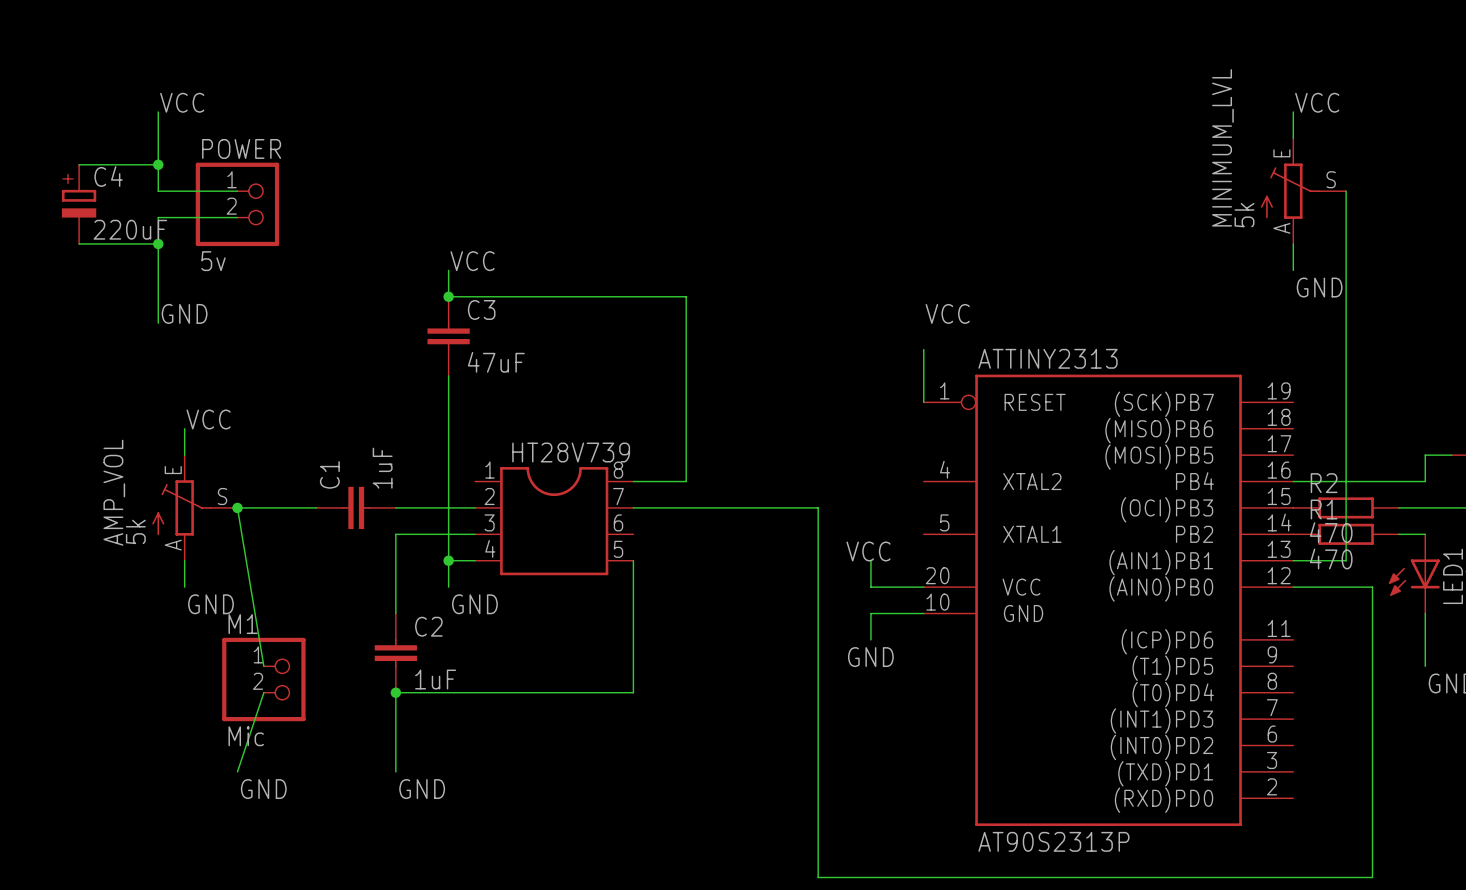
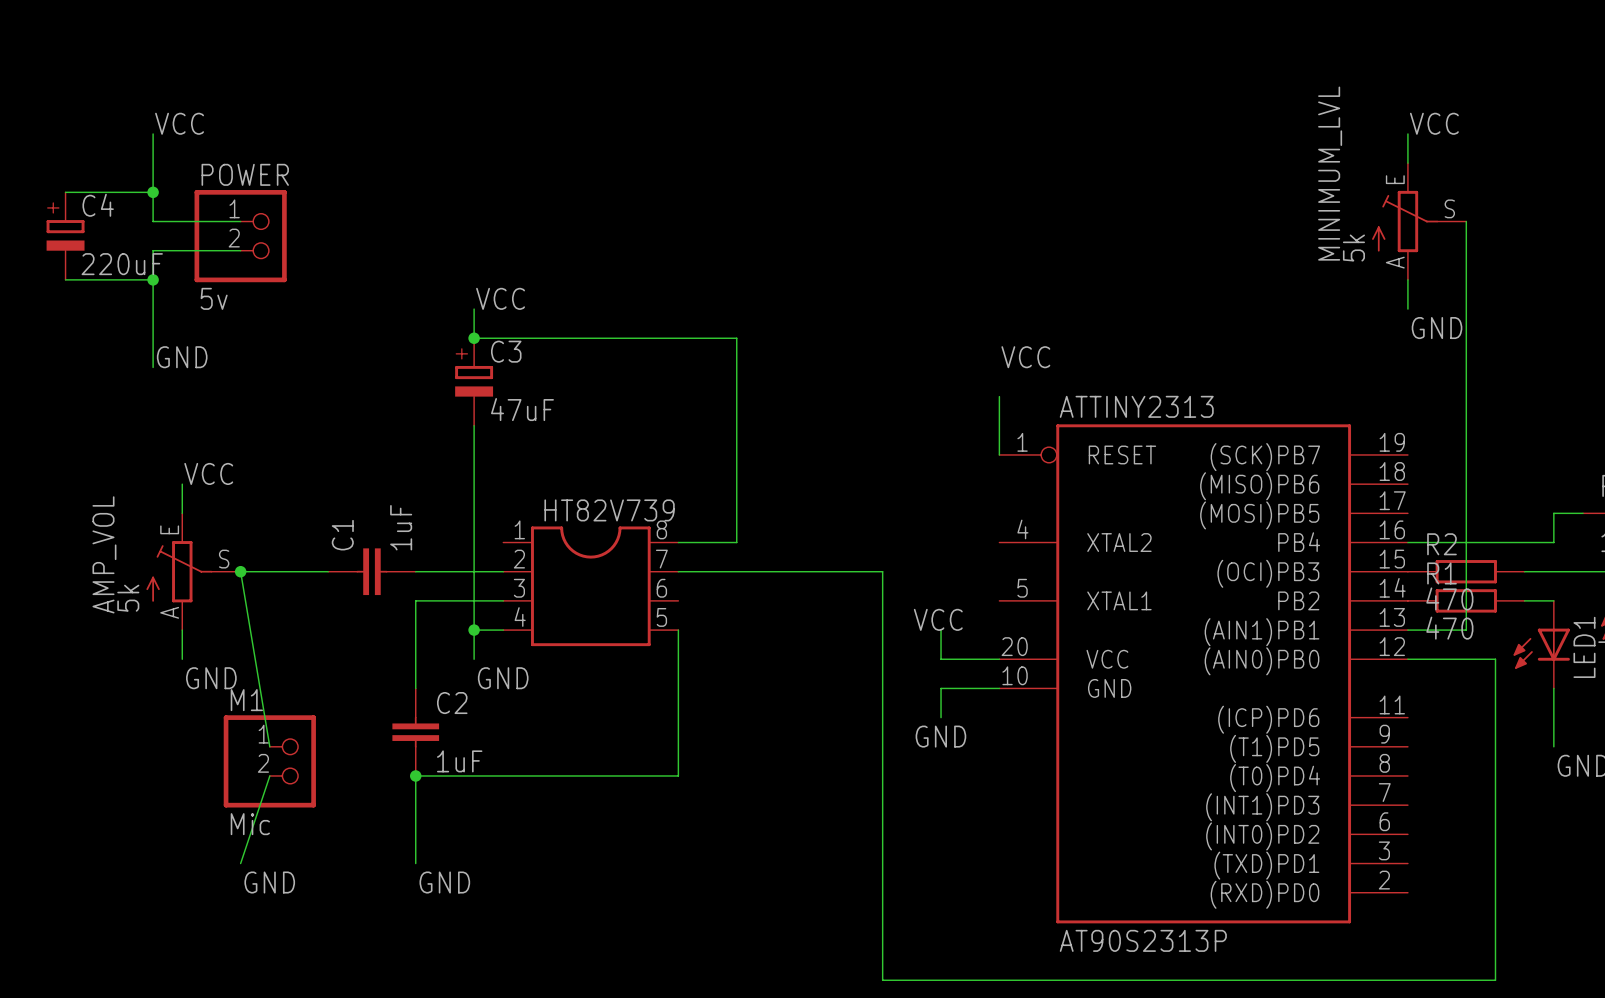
C3 symbol: [427, 296, 470, 376] -> [455, 338, 494, 426]
HT28V739 name: HT28V739 (571, 452) -> HT82V739 (609, 510)

